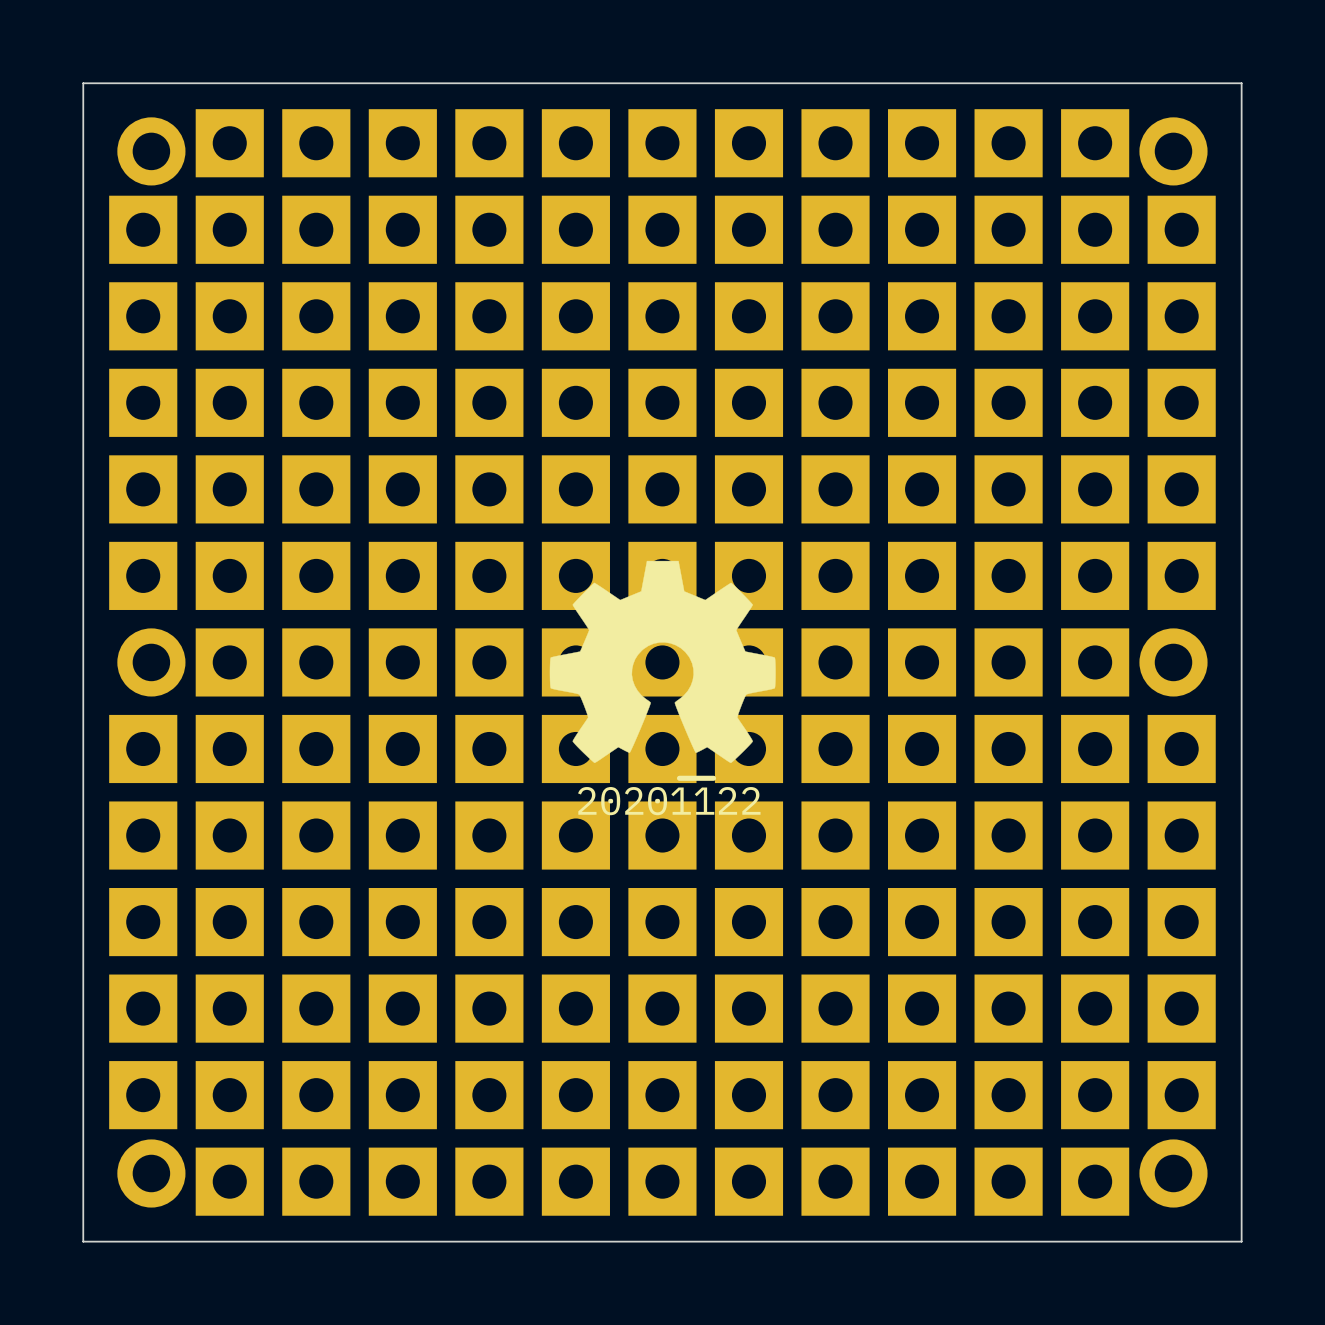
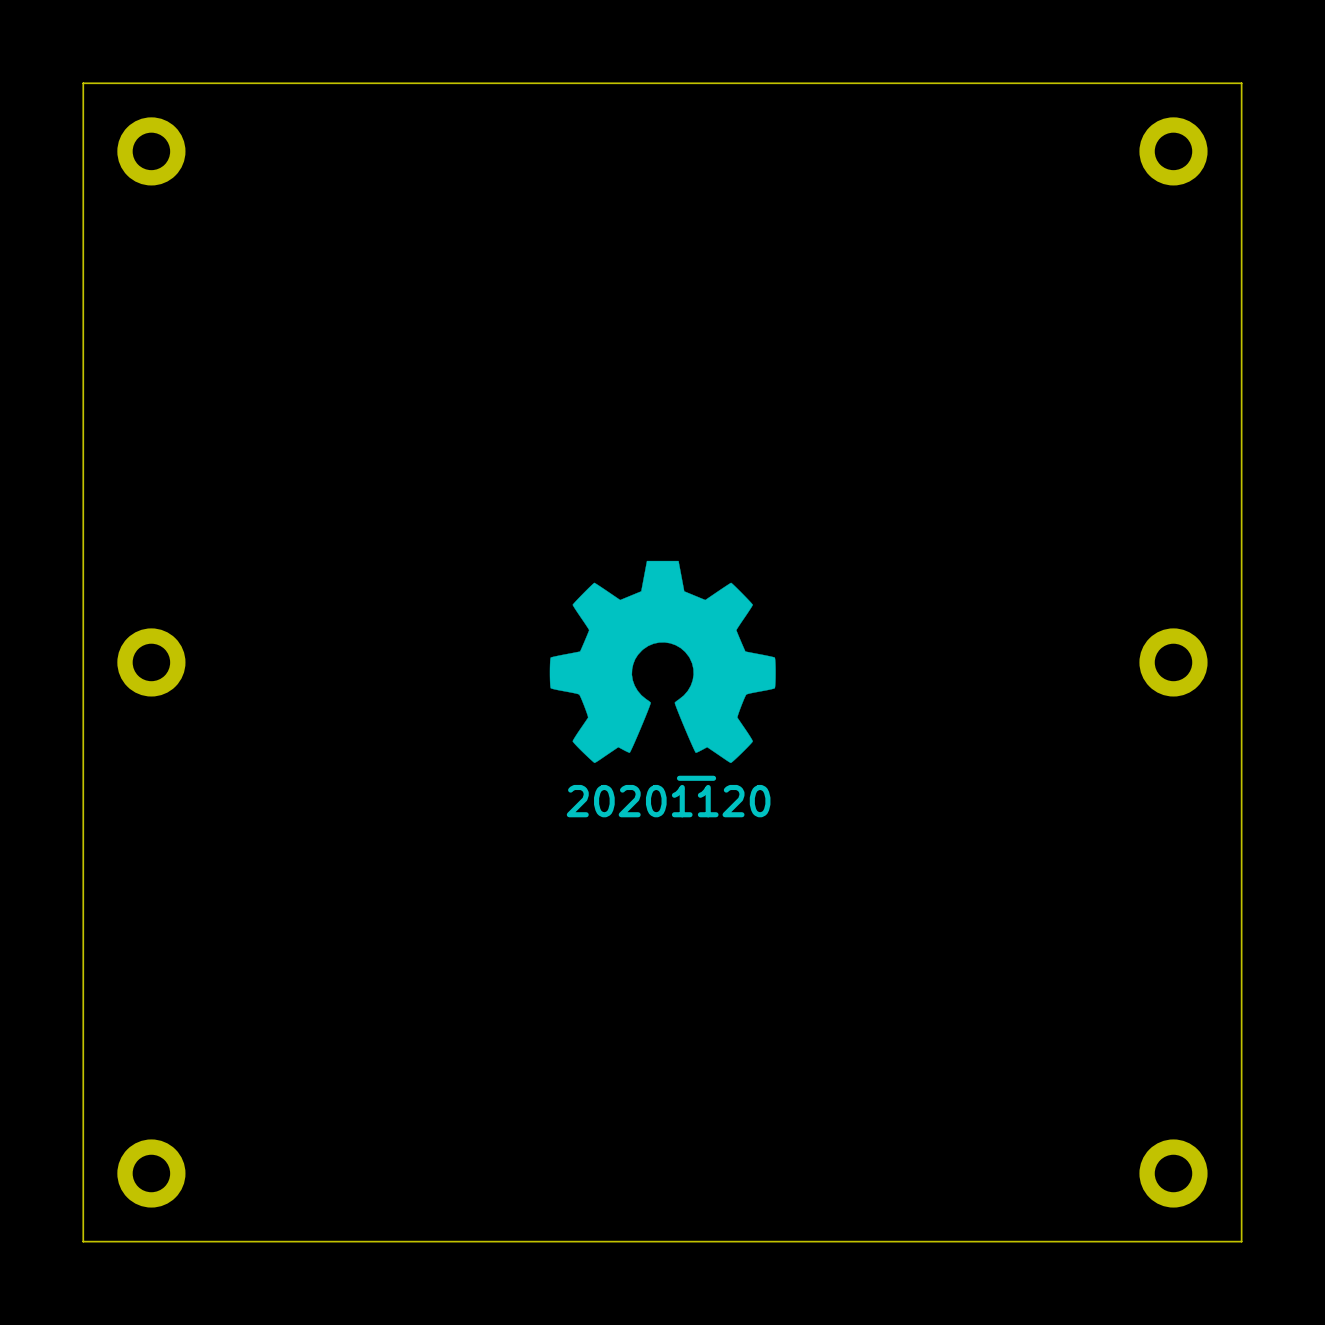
part: (662, 662) -> none
drawing shape: [578, 775, 761, 816] -> [566, 775, 771, 818]

